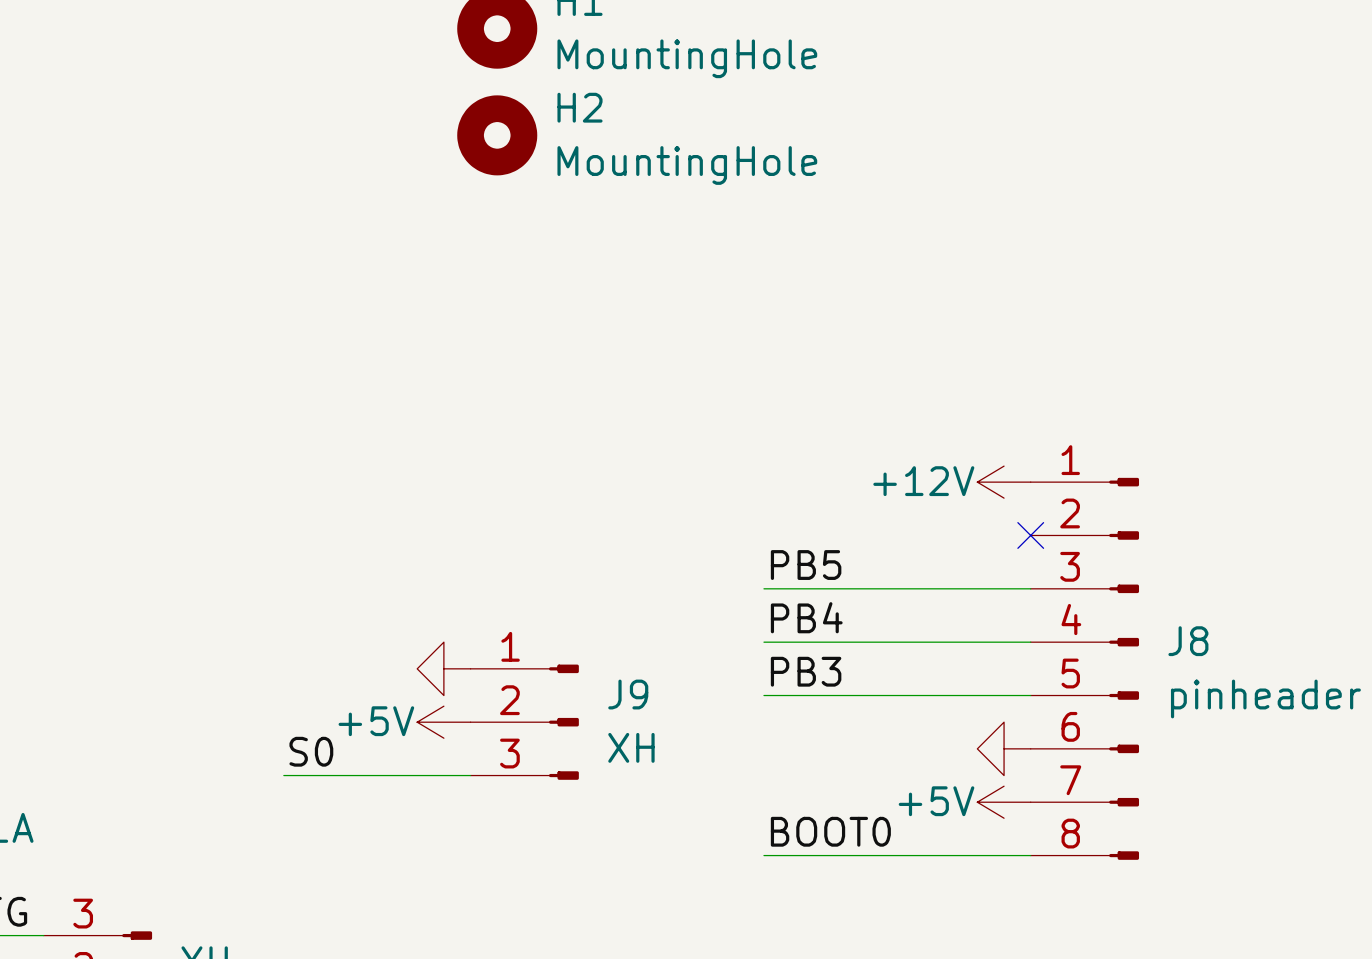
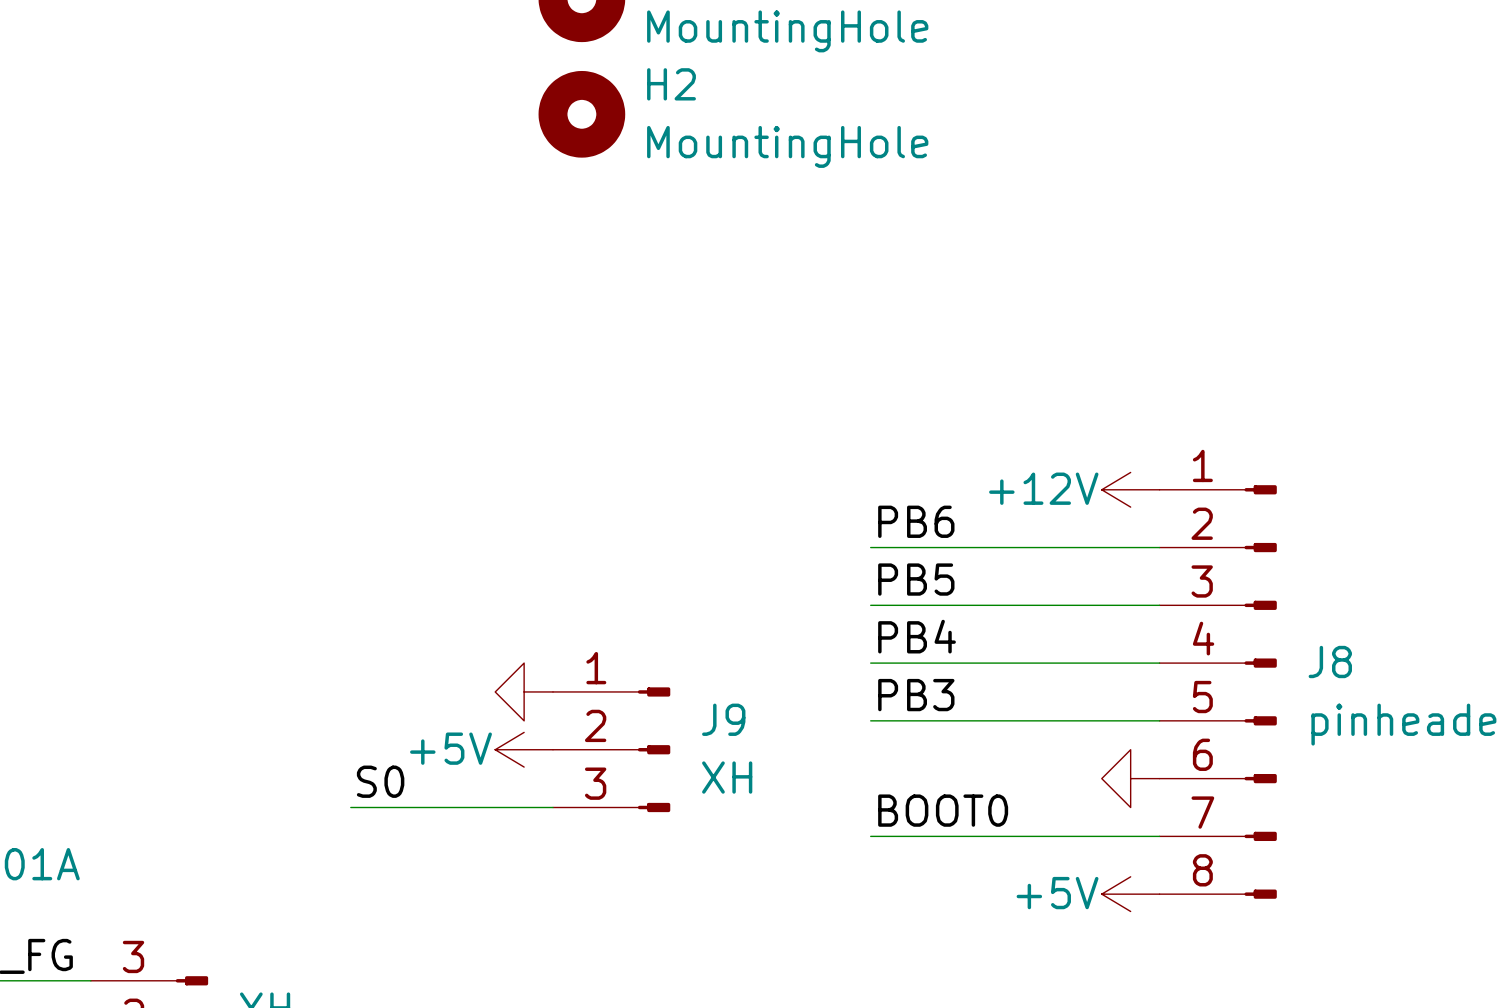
label: none -> PB6 (916, 521)
wire: none -> (870, 547) (1159, 547)
no-connect mark: (1030, 535) -> none
power symbol position: +5V (1004, 802) -> +5V (1130, 894)
label position: BOOT0 (830, 831) -> BOOT0 (943, 810)
wire: (763, 855) (1030, 855) -> (870, 836) (1159, 836)

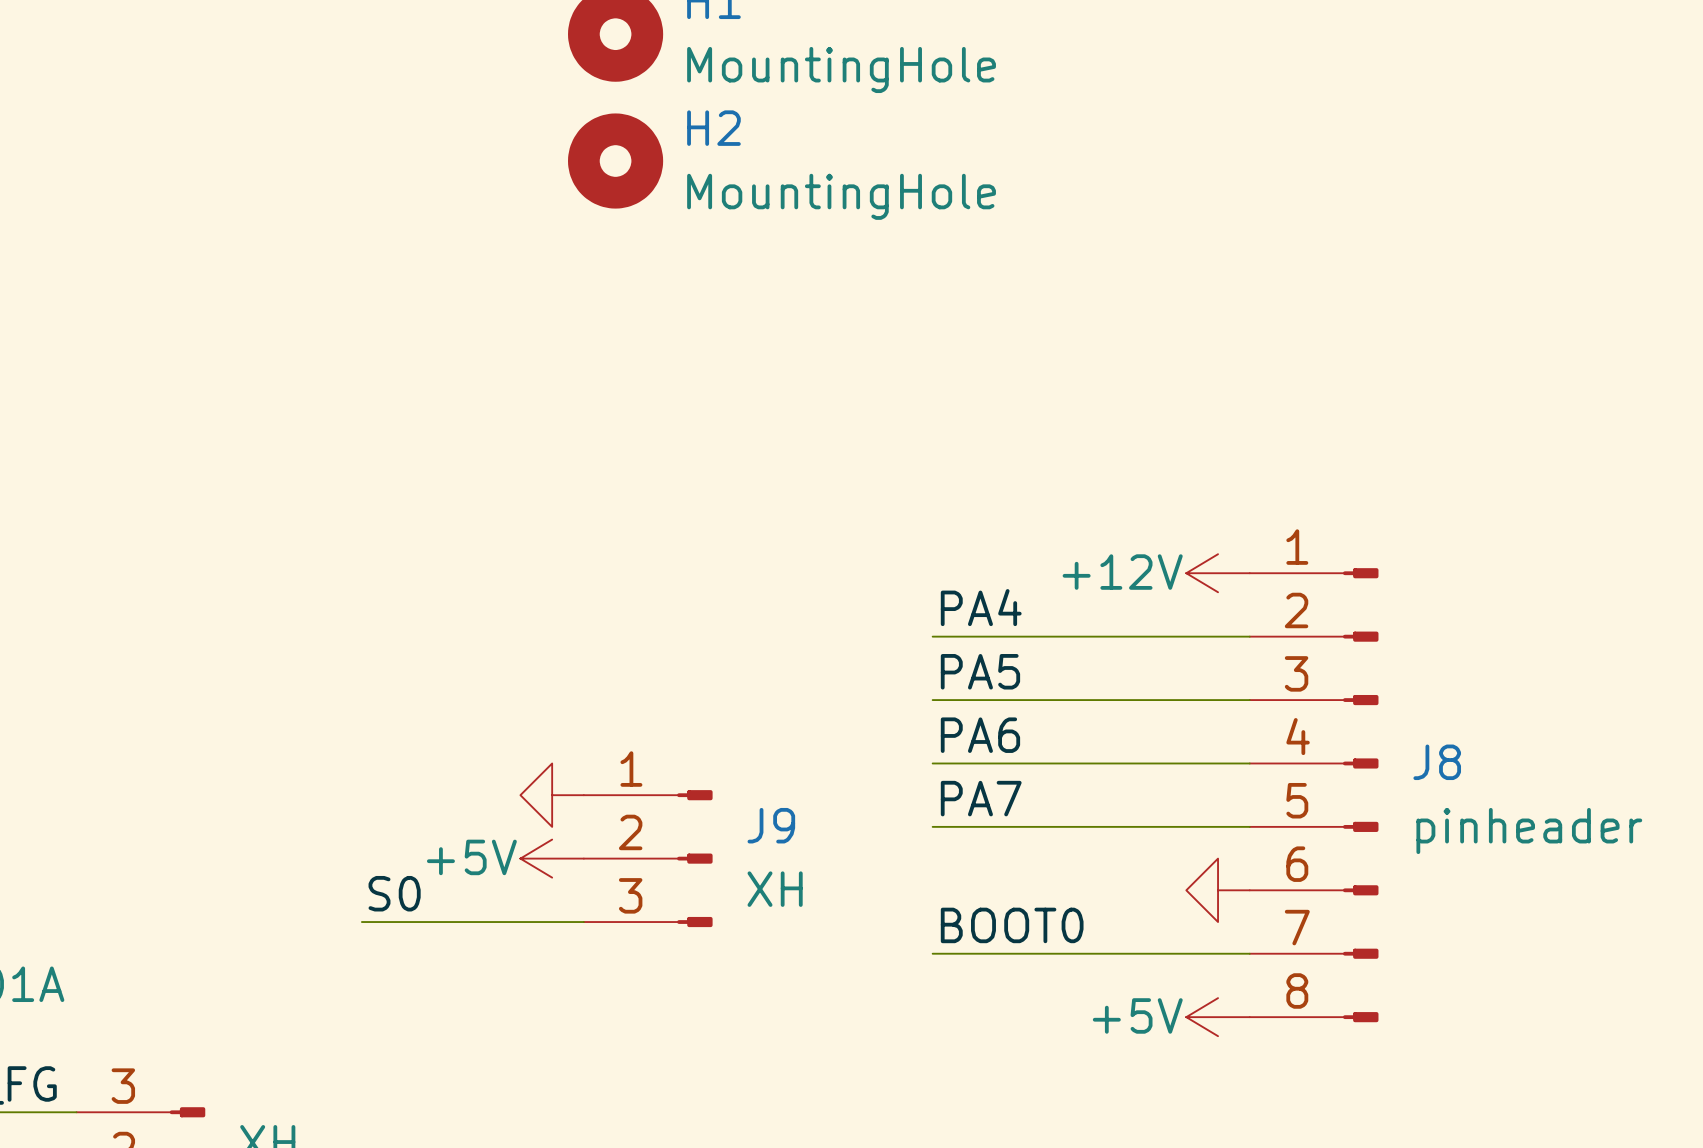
label: PB6 (916, 521) -> PA4 (981, 607)
label: PB5 (916, 579) -> PA5 (980, 671)
label: PB4 (917, 636) -> PA6 (980, 735)
label: PB3 (916, 695) -> PA7 (981, 798)

